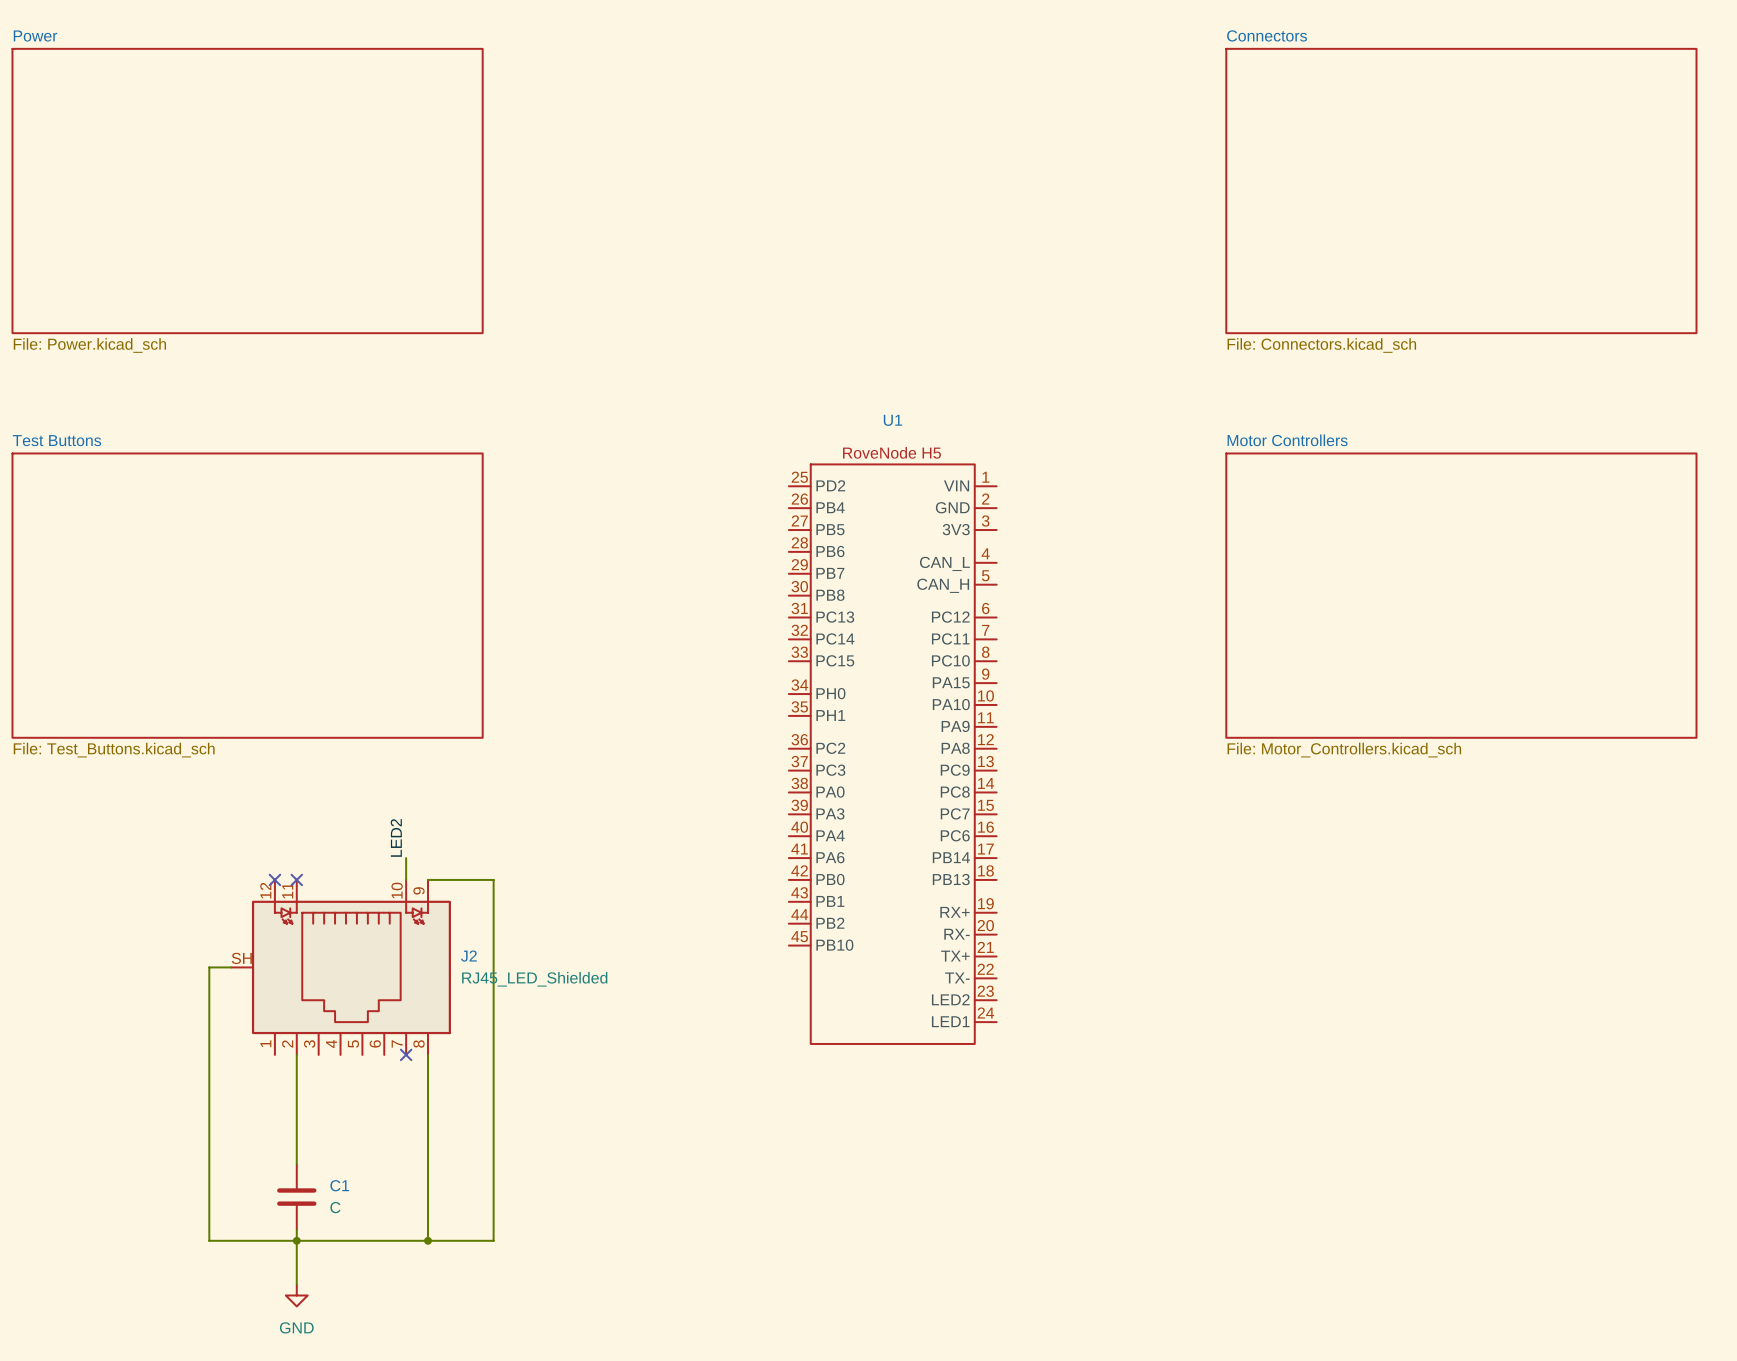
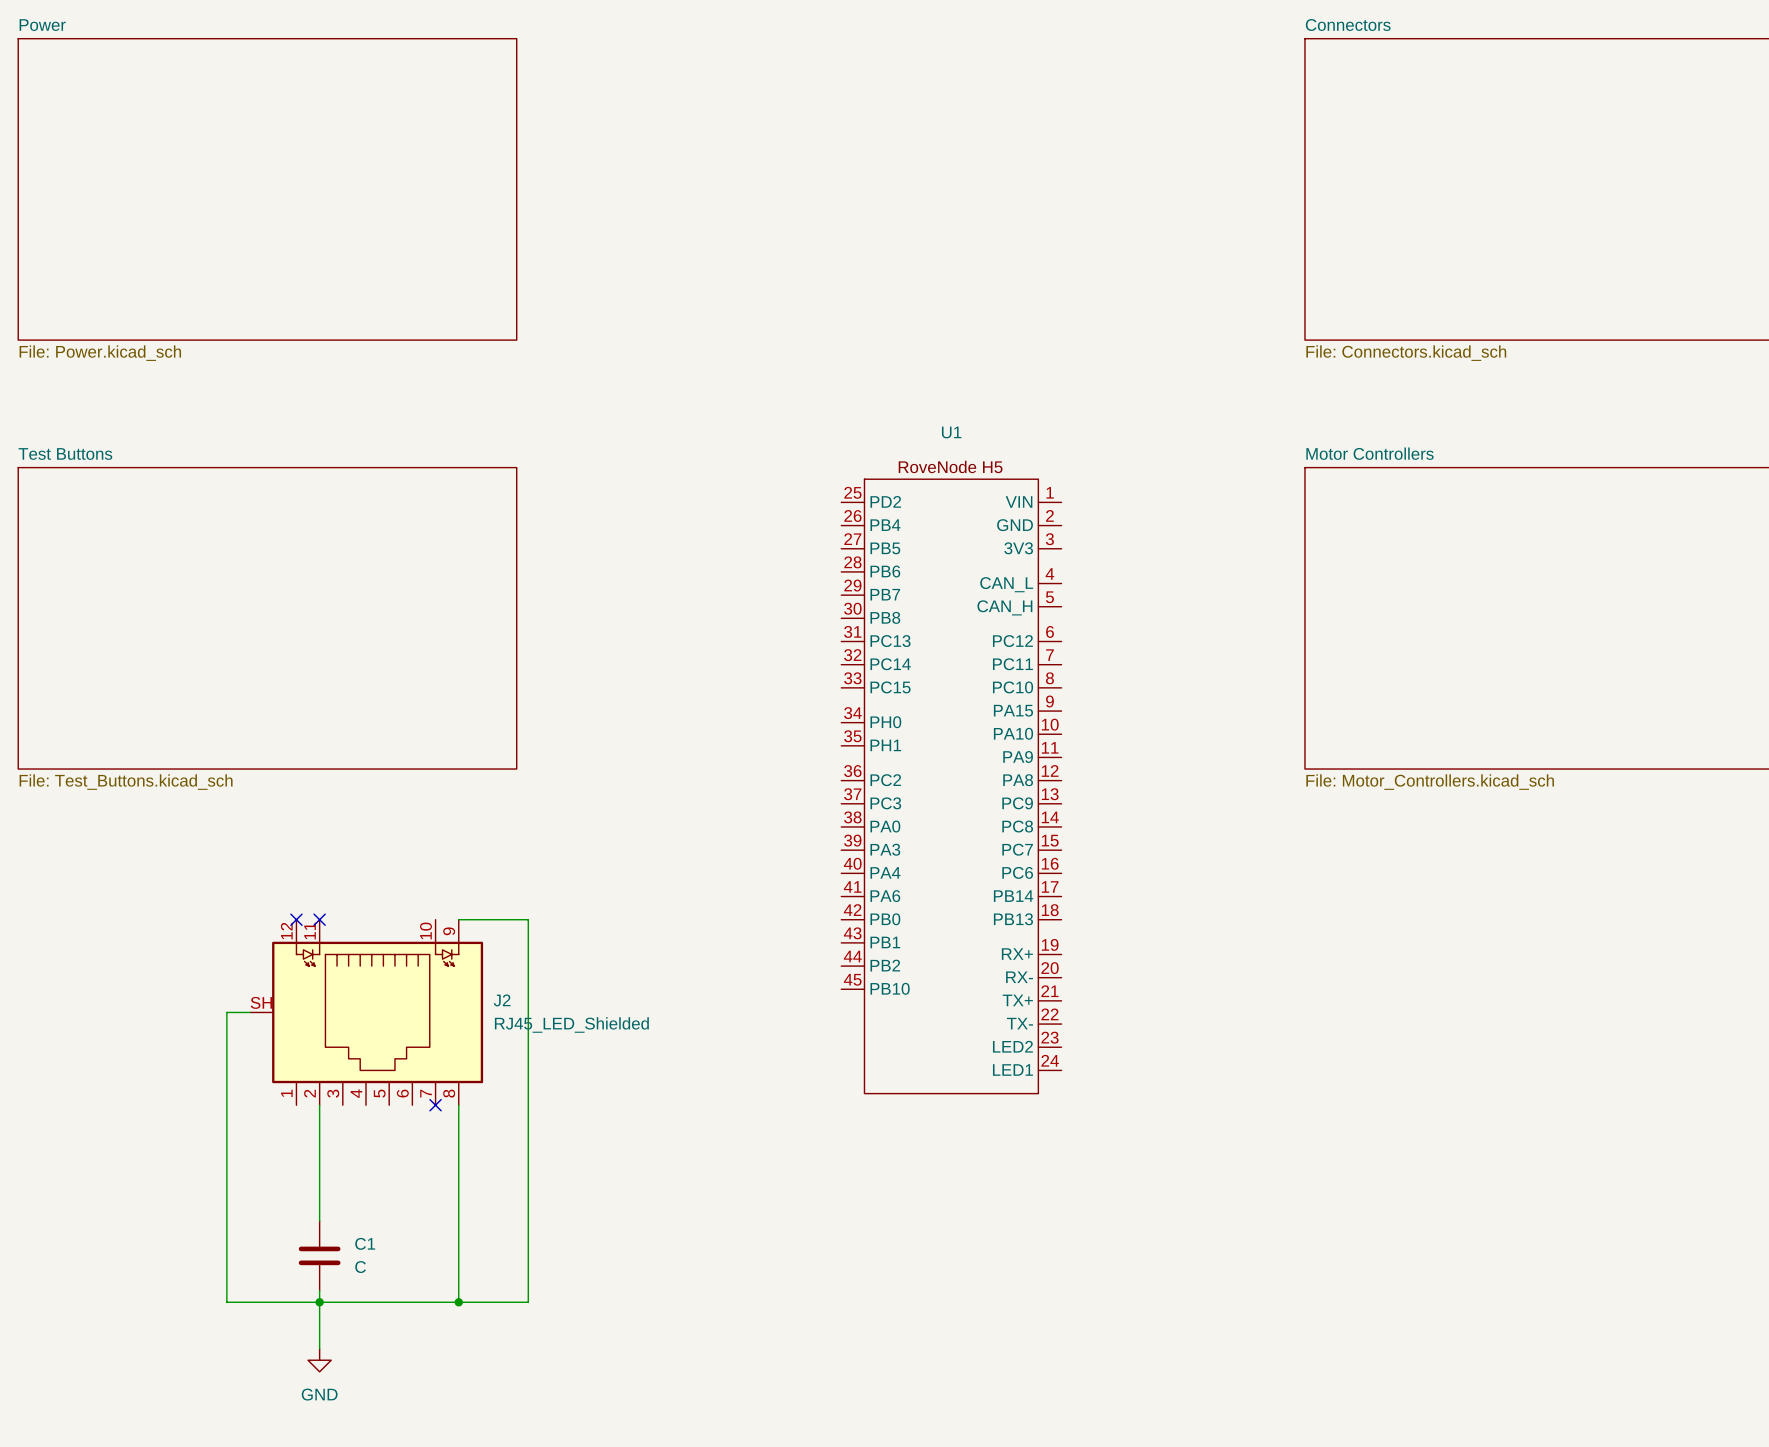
label: LED2 (396, 837) -> none
wire: (406, 858) (406, 879) -> none

